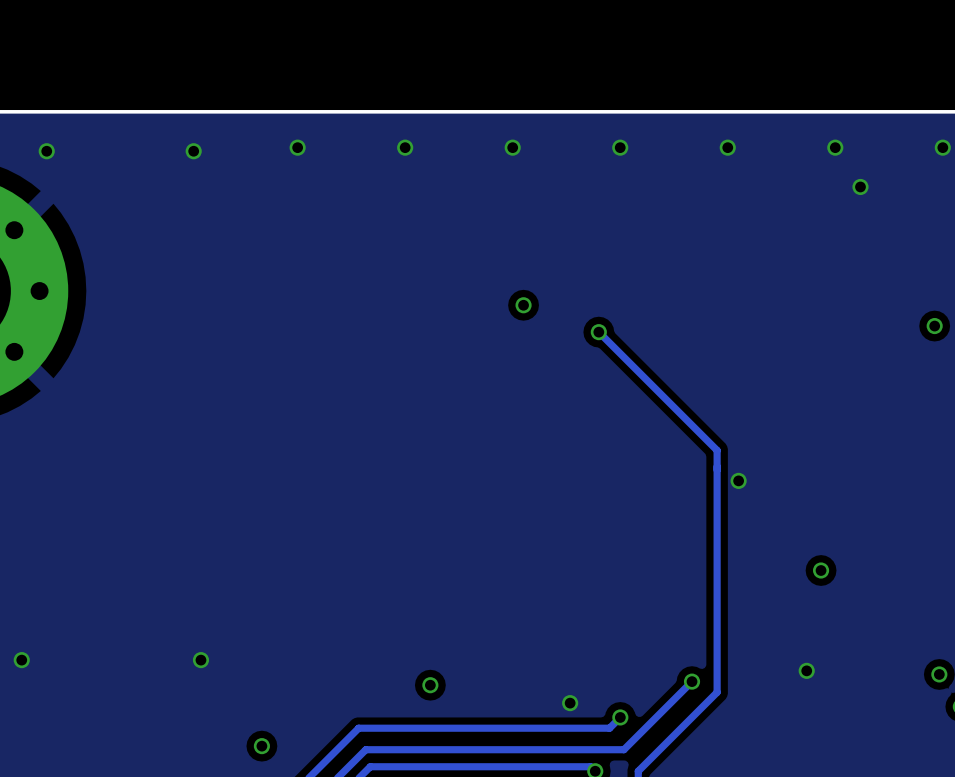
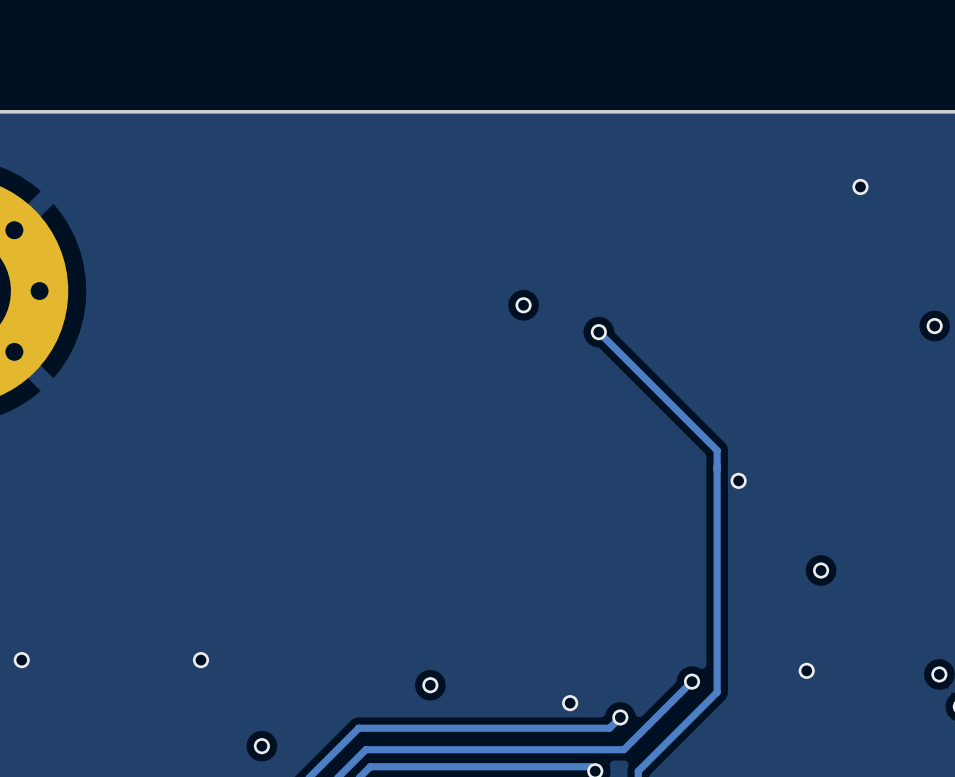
via: (297, 147) -> none
via: (405, 147) -> none
via: (512, 147) -> none
via: (620, 147) -> none
via: (727, 147) -> none
via: (835, 147) -> none
via: (942, 147) -> none
via: (46, 151) -> none
via: (193, 151) -> none

